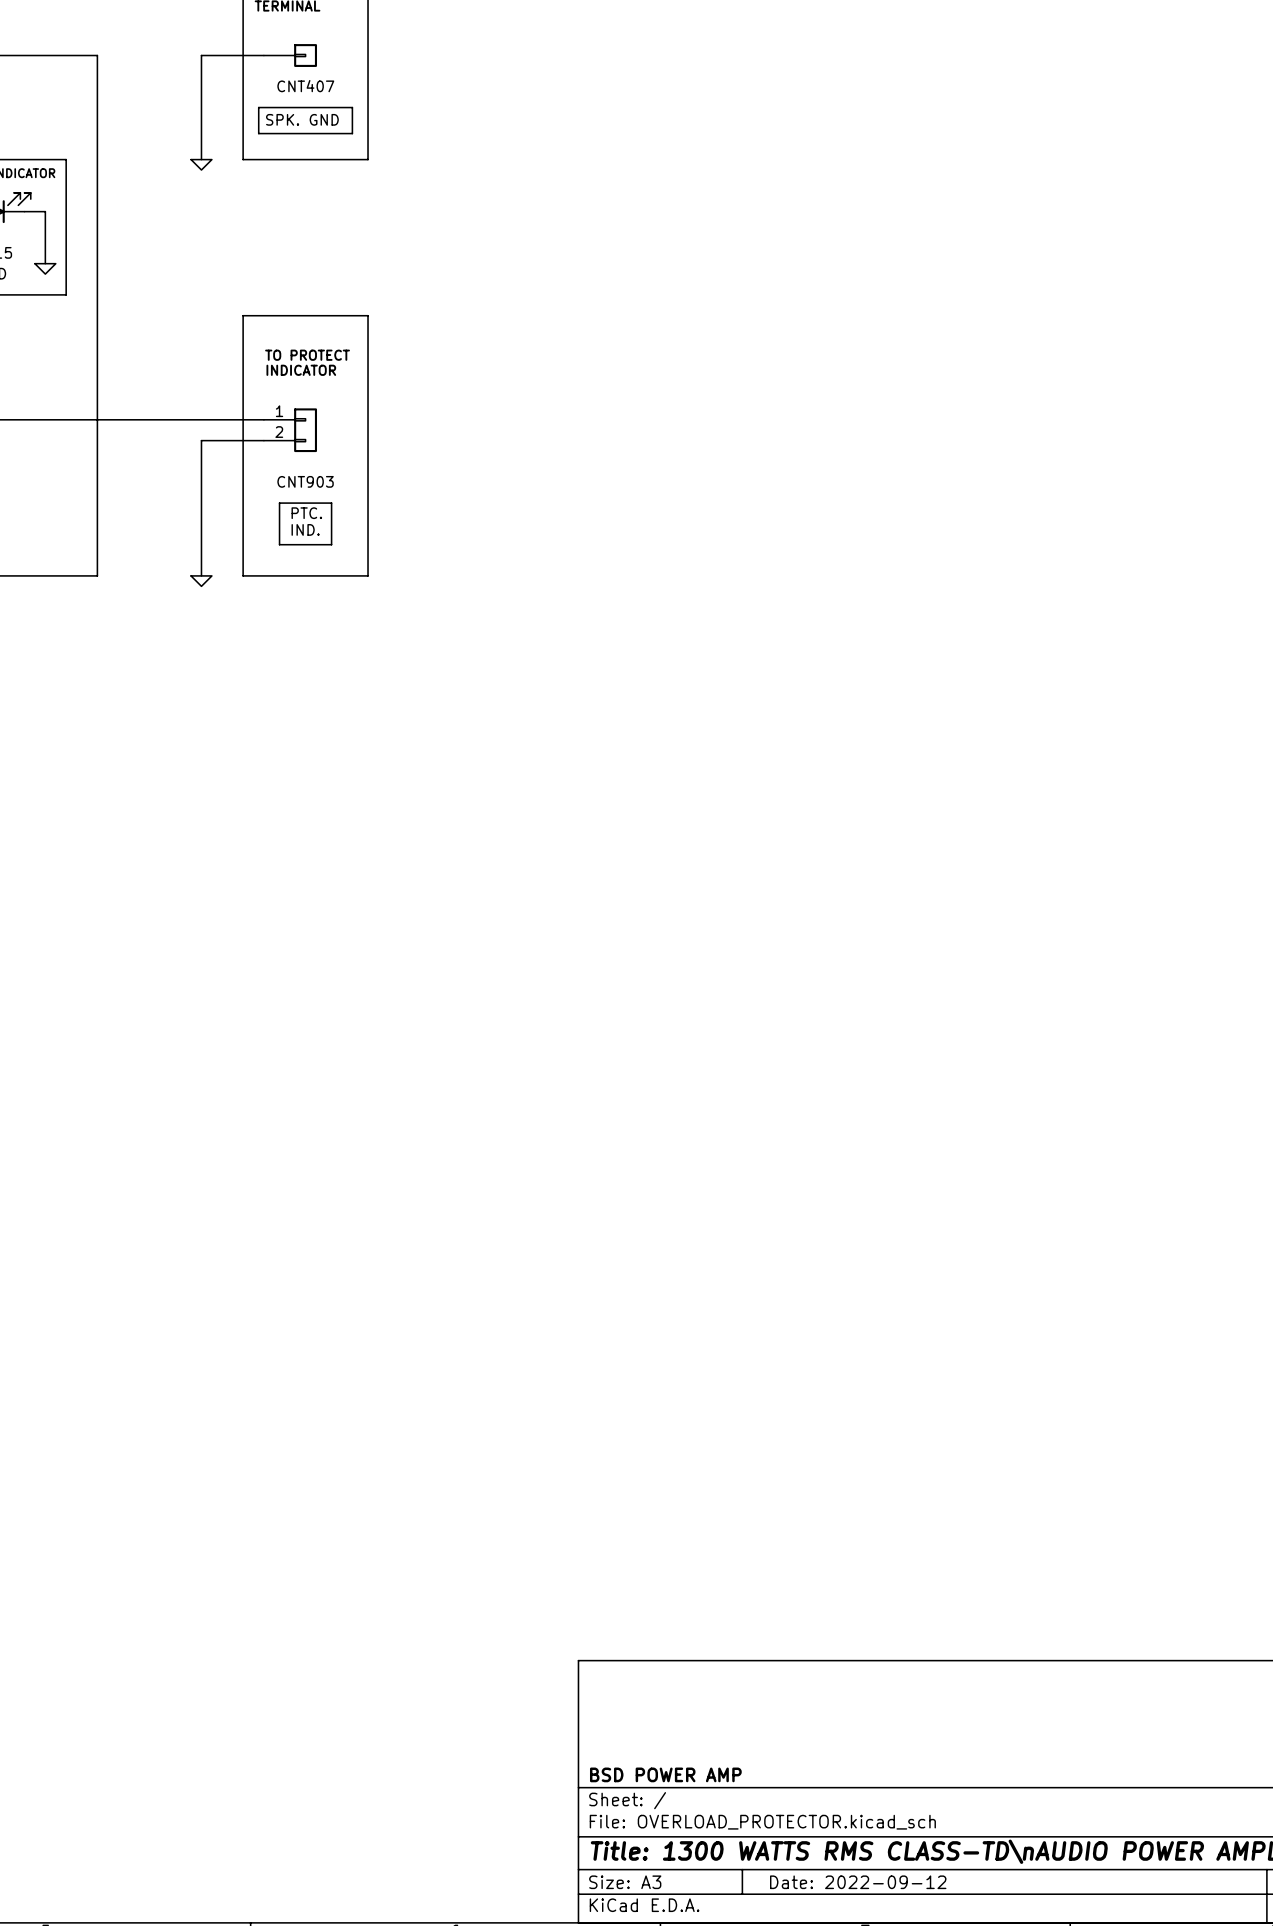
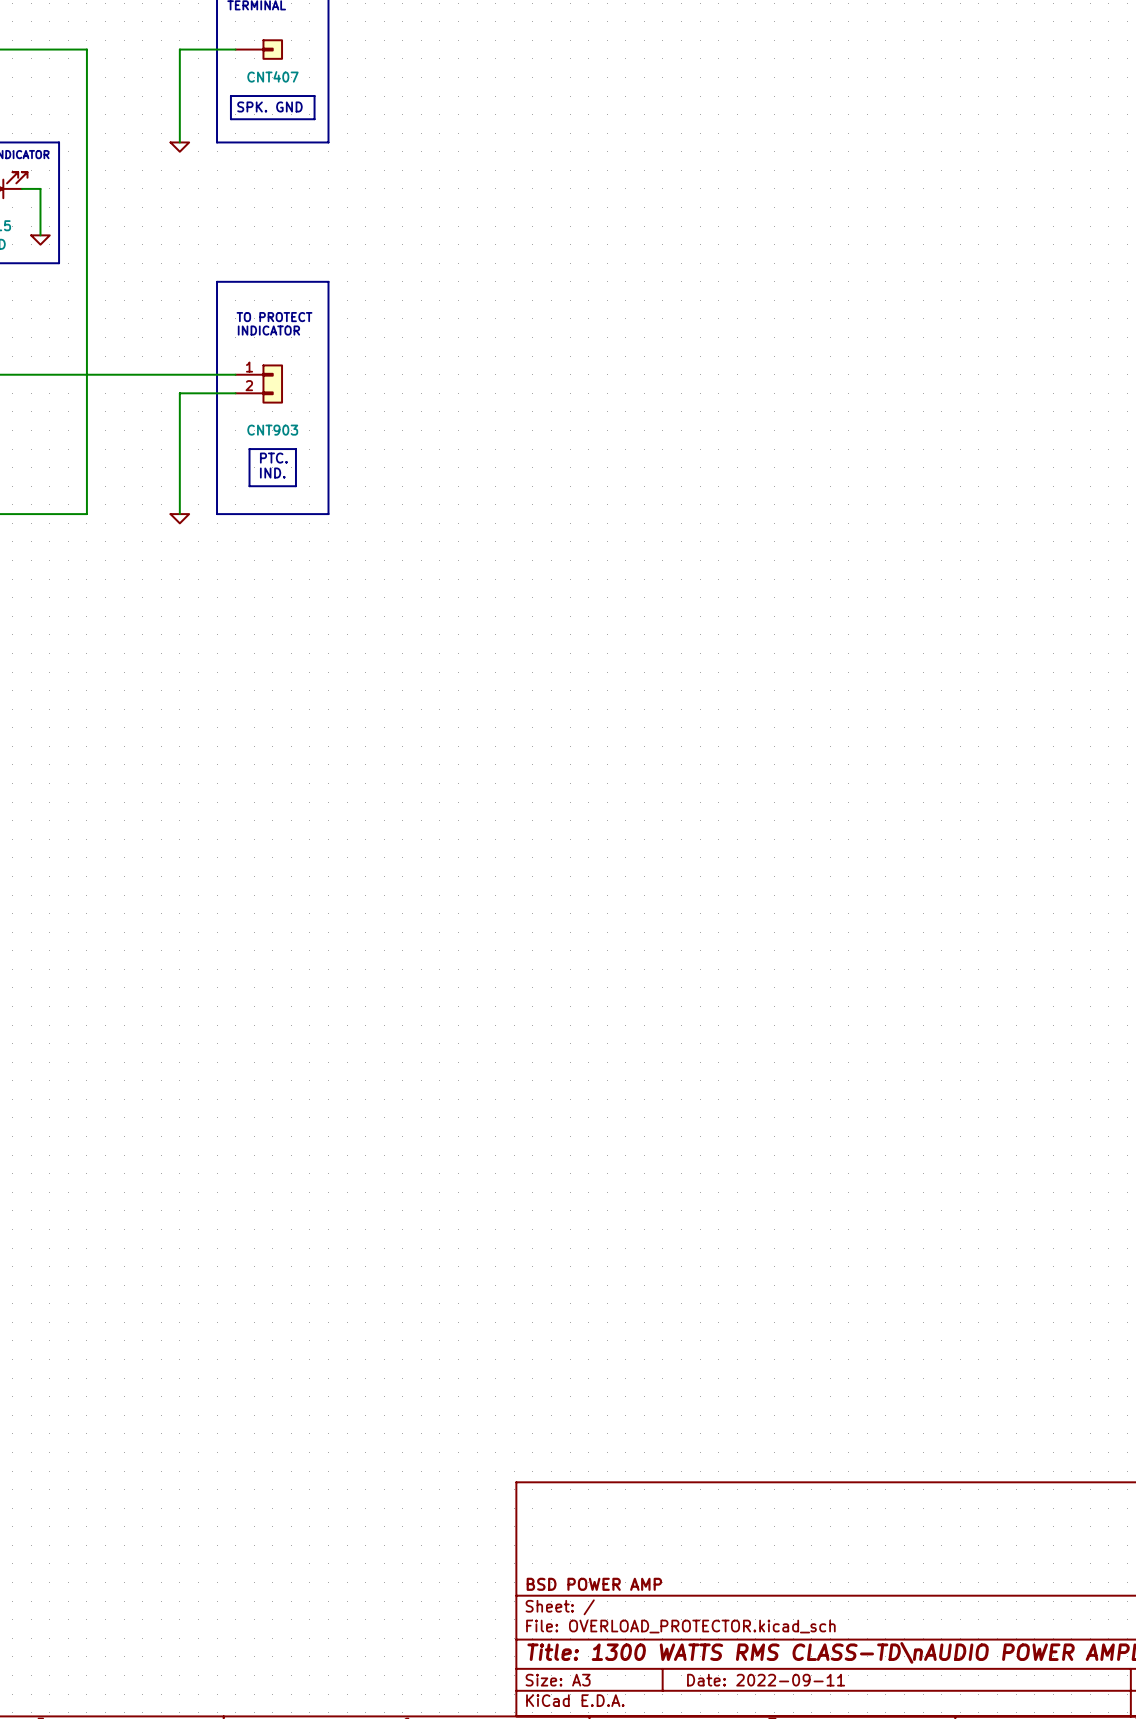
title block: Date: 2022-09-12 (858, 1882) -> Date: 2022-09-11 (766, 1680)

